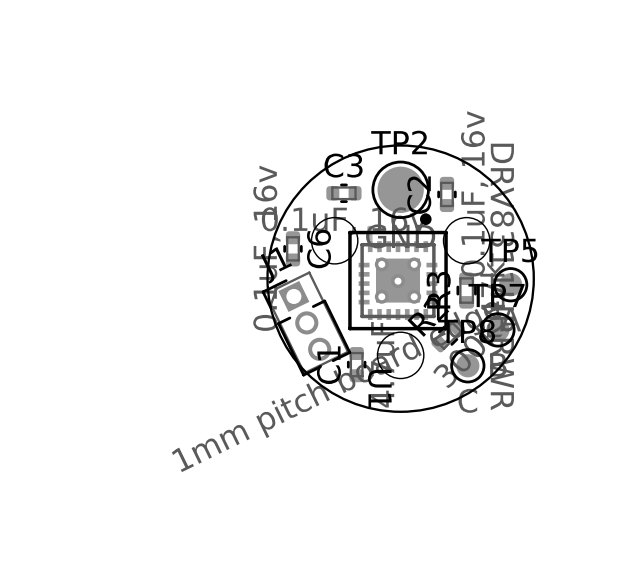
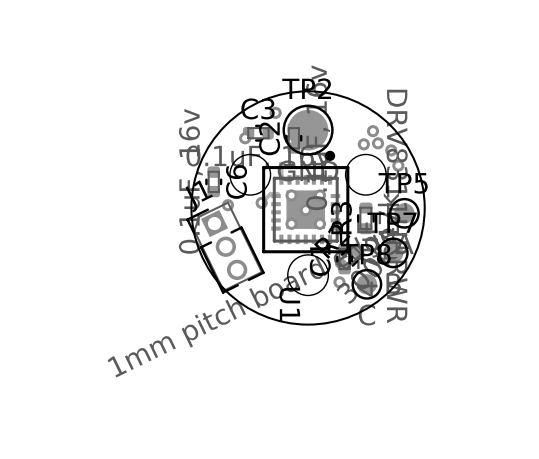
via: none -> (275, 112)
via: none -> (372, 131)
C2 position: (446, 194) -> (293, 138)
via: none -> (245, 138)
via: none -> (378, 143)
via: none -> (363, 144)
via: none -> (391, 150)
via: none -> (398, 165)
track: none -> (278, 194) (270, 194) (261, 202)
via: none -> (261, 202)
via: none -> (227, 205)
via: none -> (339, 282)
C1 position: (356, 364) -> (344, 258)

